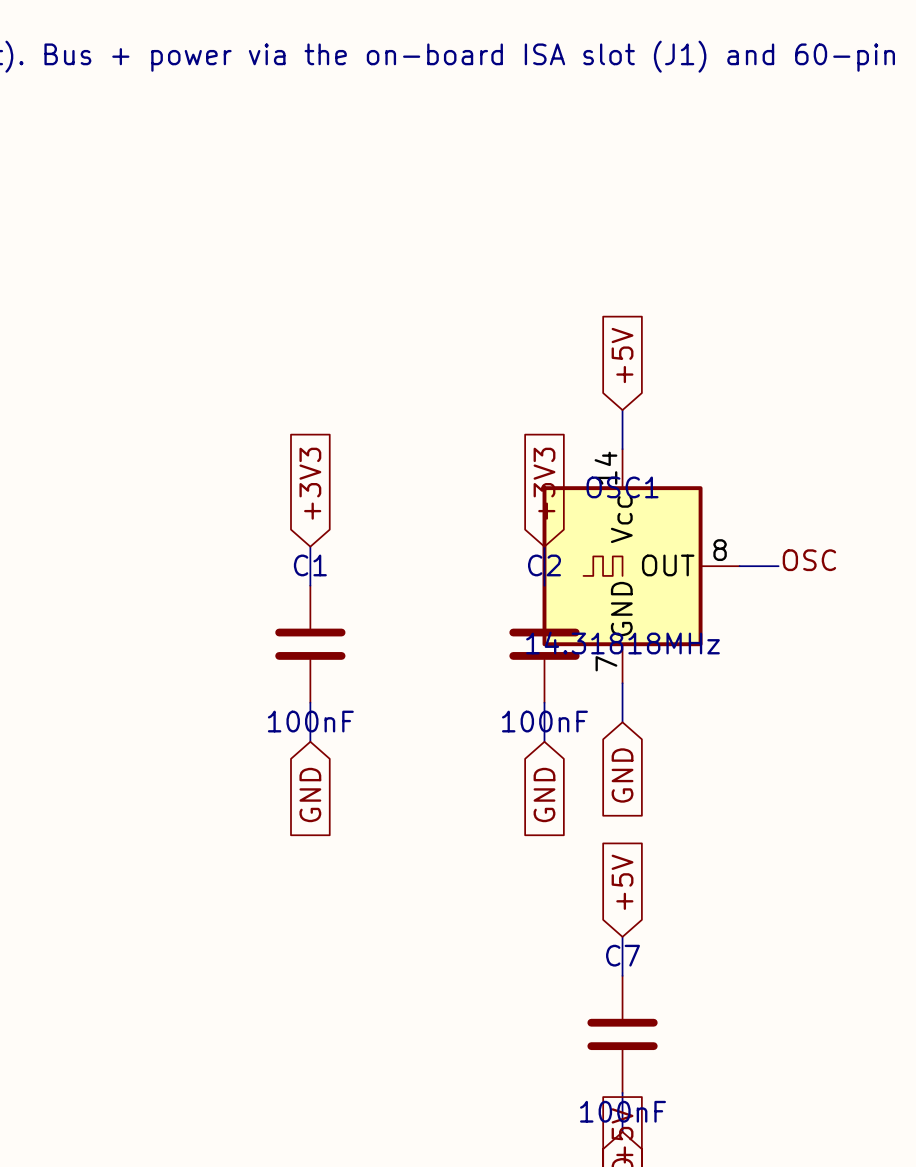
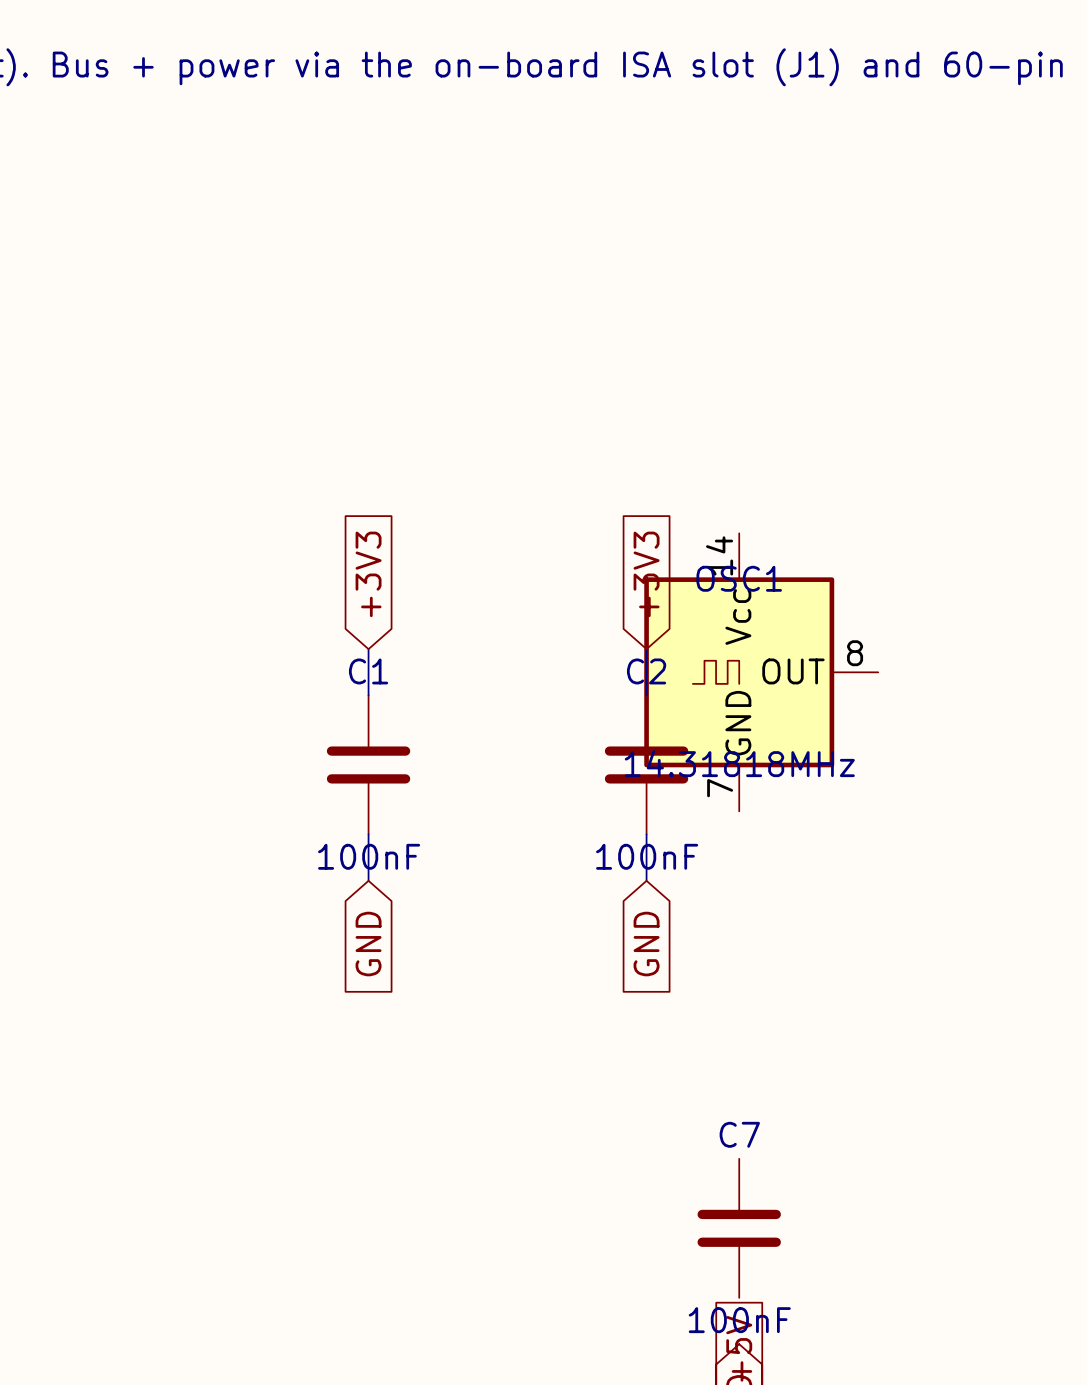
global label: +5V (622, 355) -> none
wire: (622, 410) (622, 449) -> none
label: OSC (809, 560) -> none
wire: (739, 566) (778, 566) -> none
wire: (622, 683) (622, 722) -> none
global label: GND (622, 775) -> none
global label: +5V (622, 882) -> none
wire: (622, 936) (622, 975) -> none
wire: (622, 1092) (622, 1131) -> none

